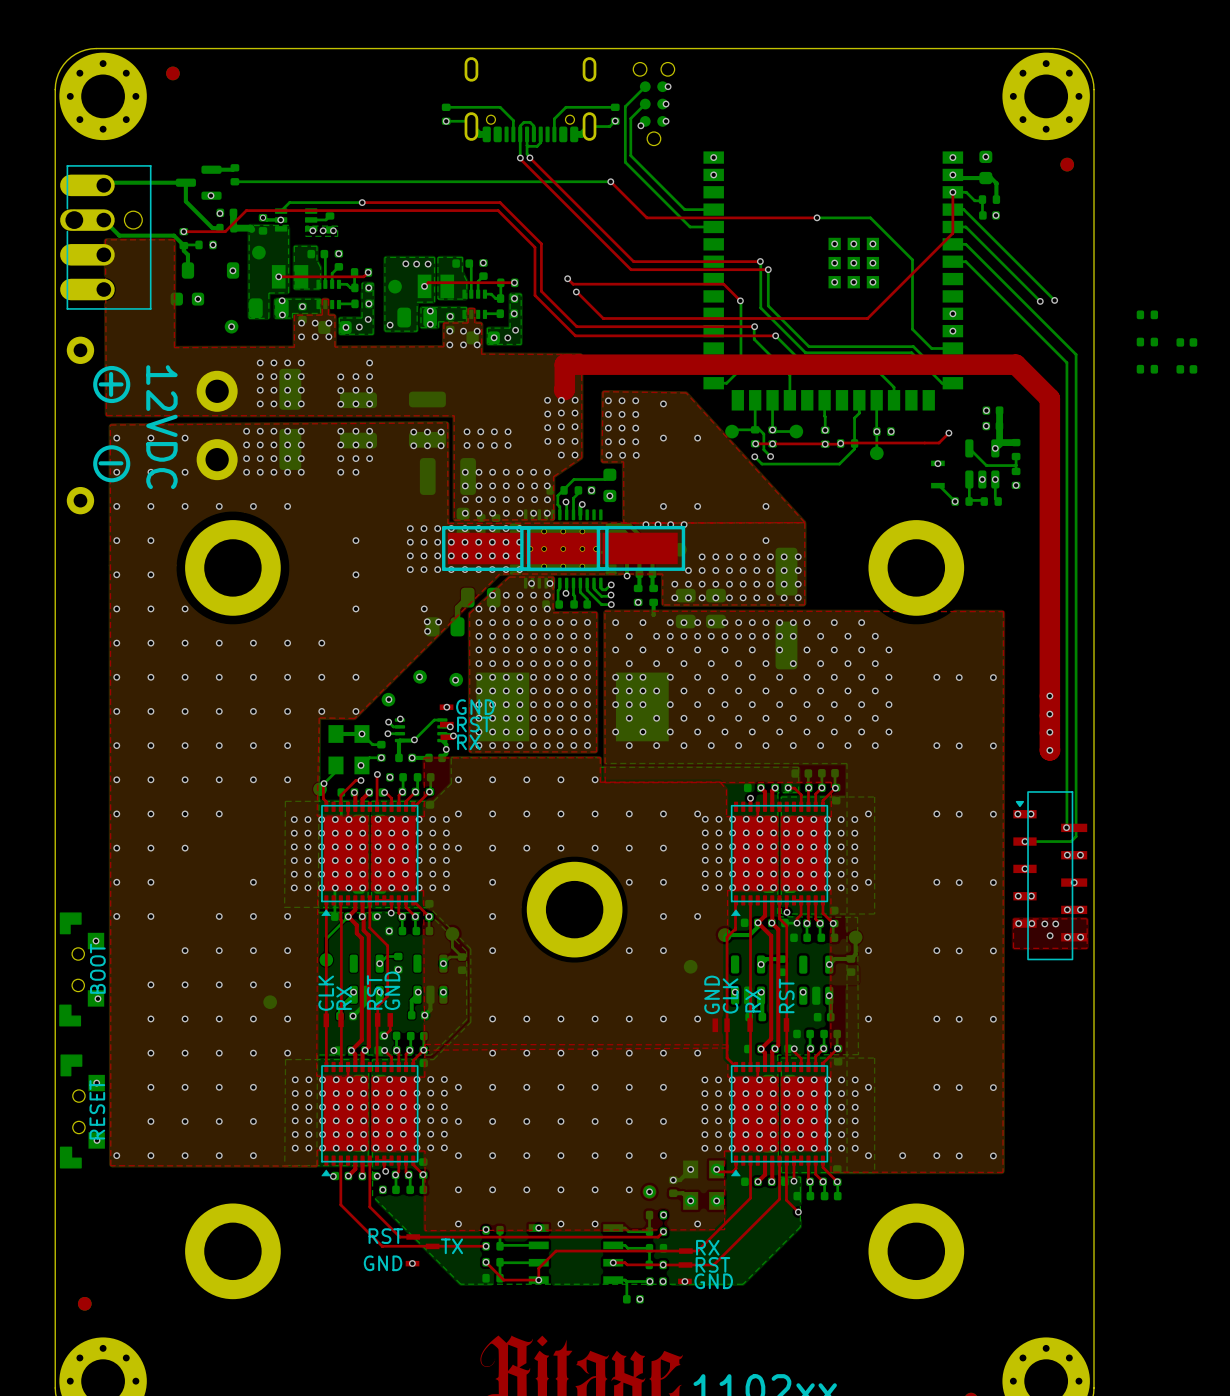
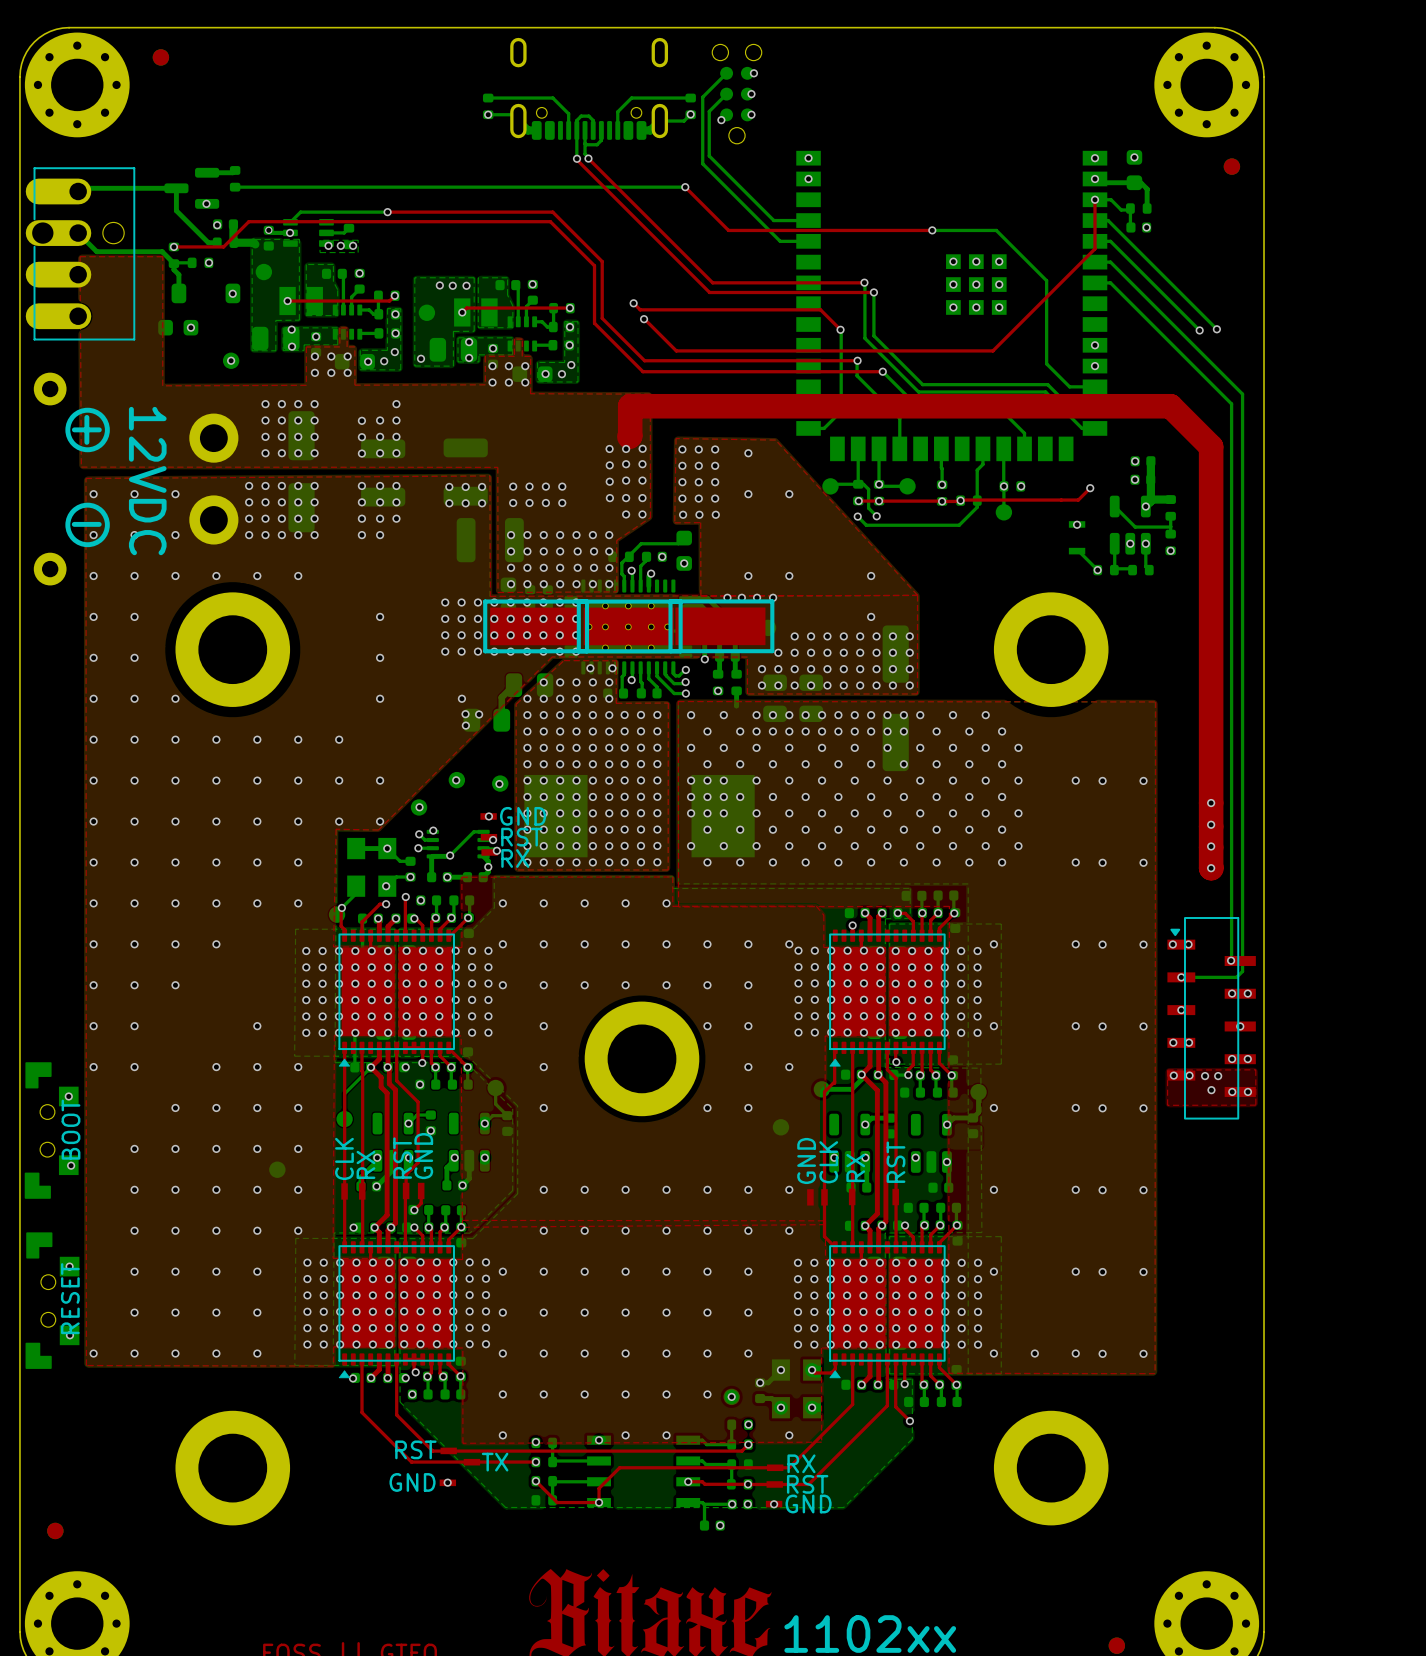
part: (1147, 314) -> none
part: (1147, 342) -> none
part: (1186, 342) -> none
part: (1147, 369) -> none
part: (1186, 369) -> none

